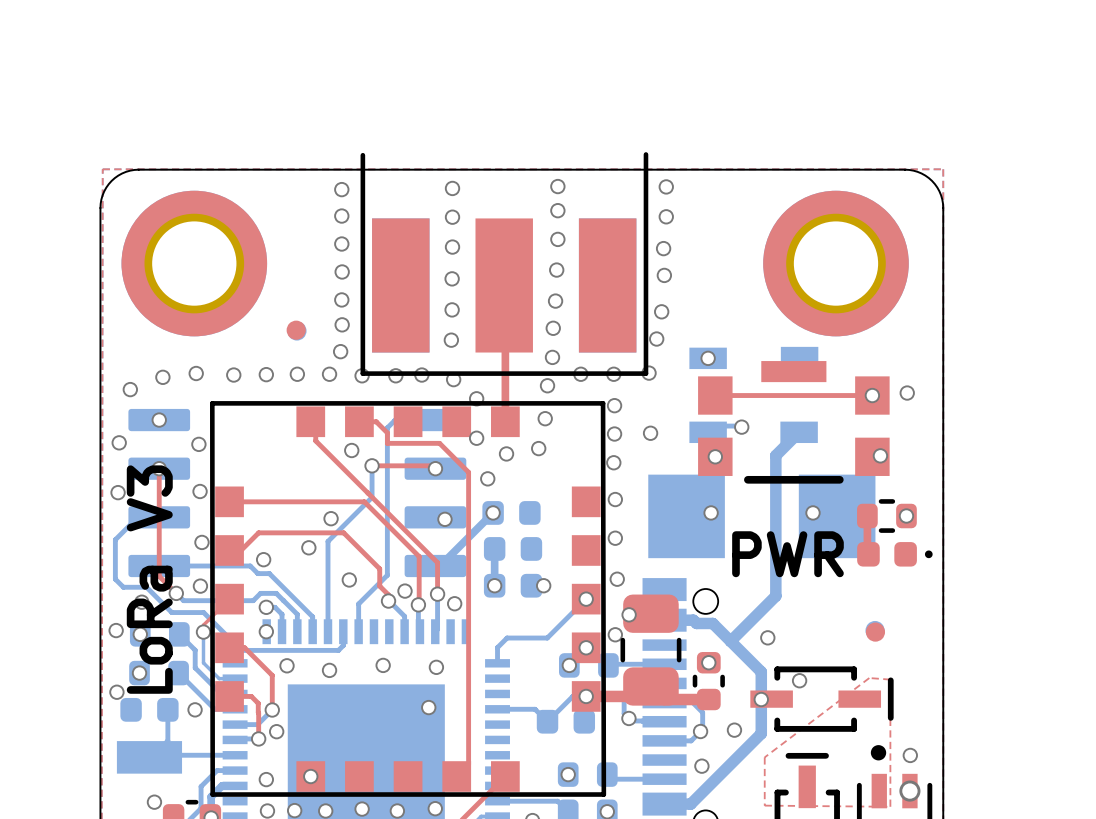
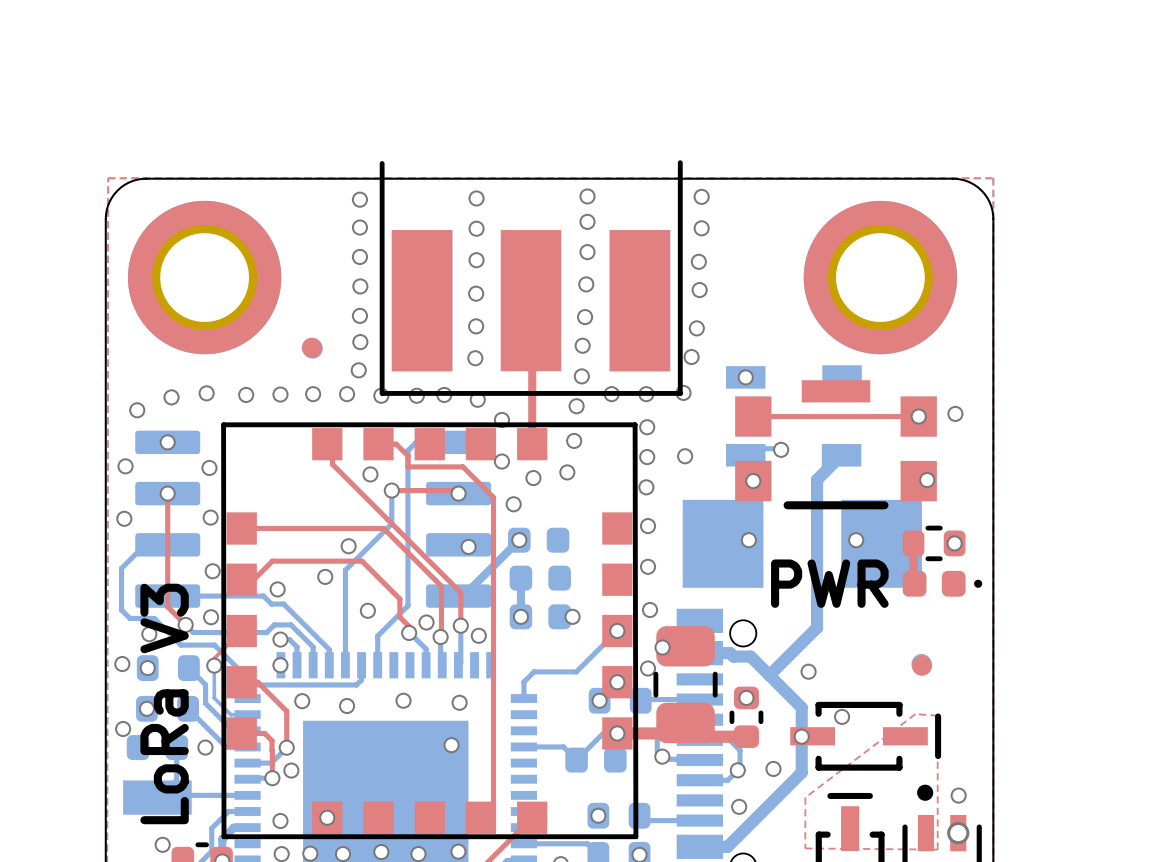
text position: LoRa V3 (149, 579) -> LoRa V3 (164, 703)

